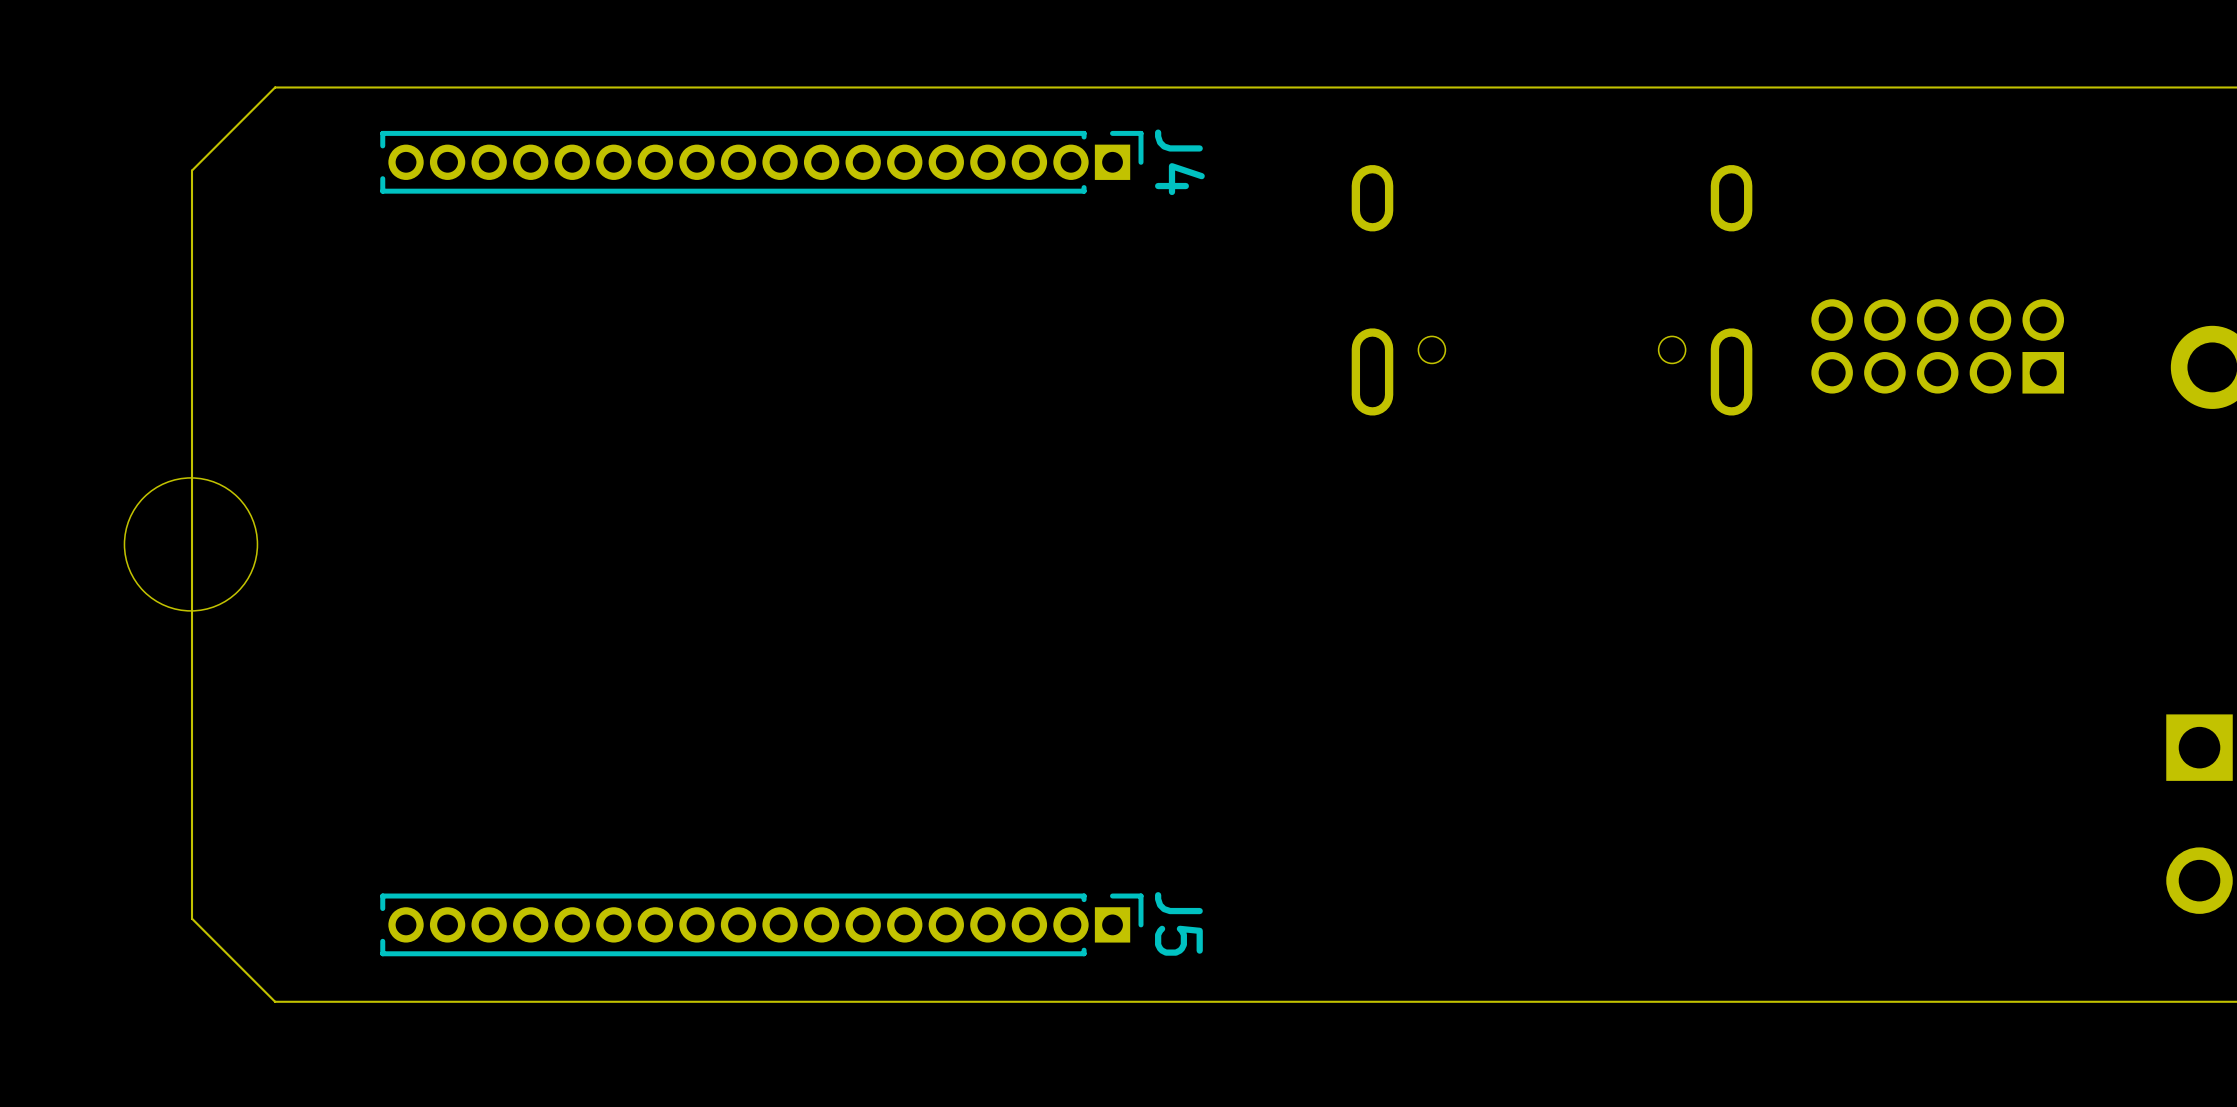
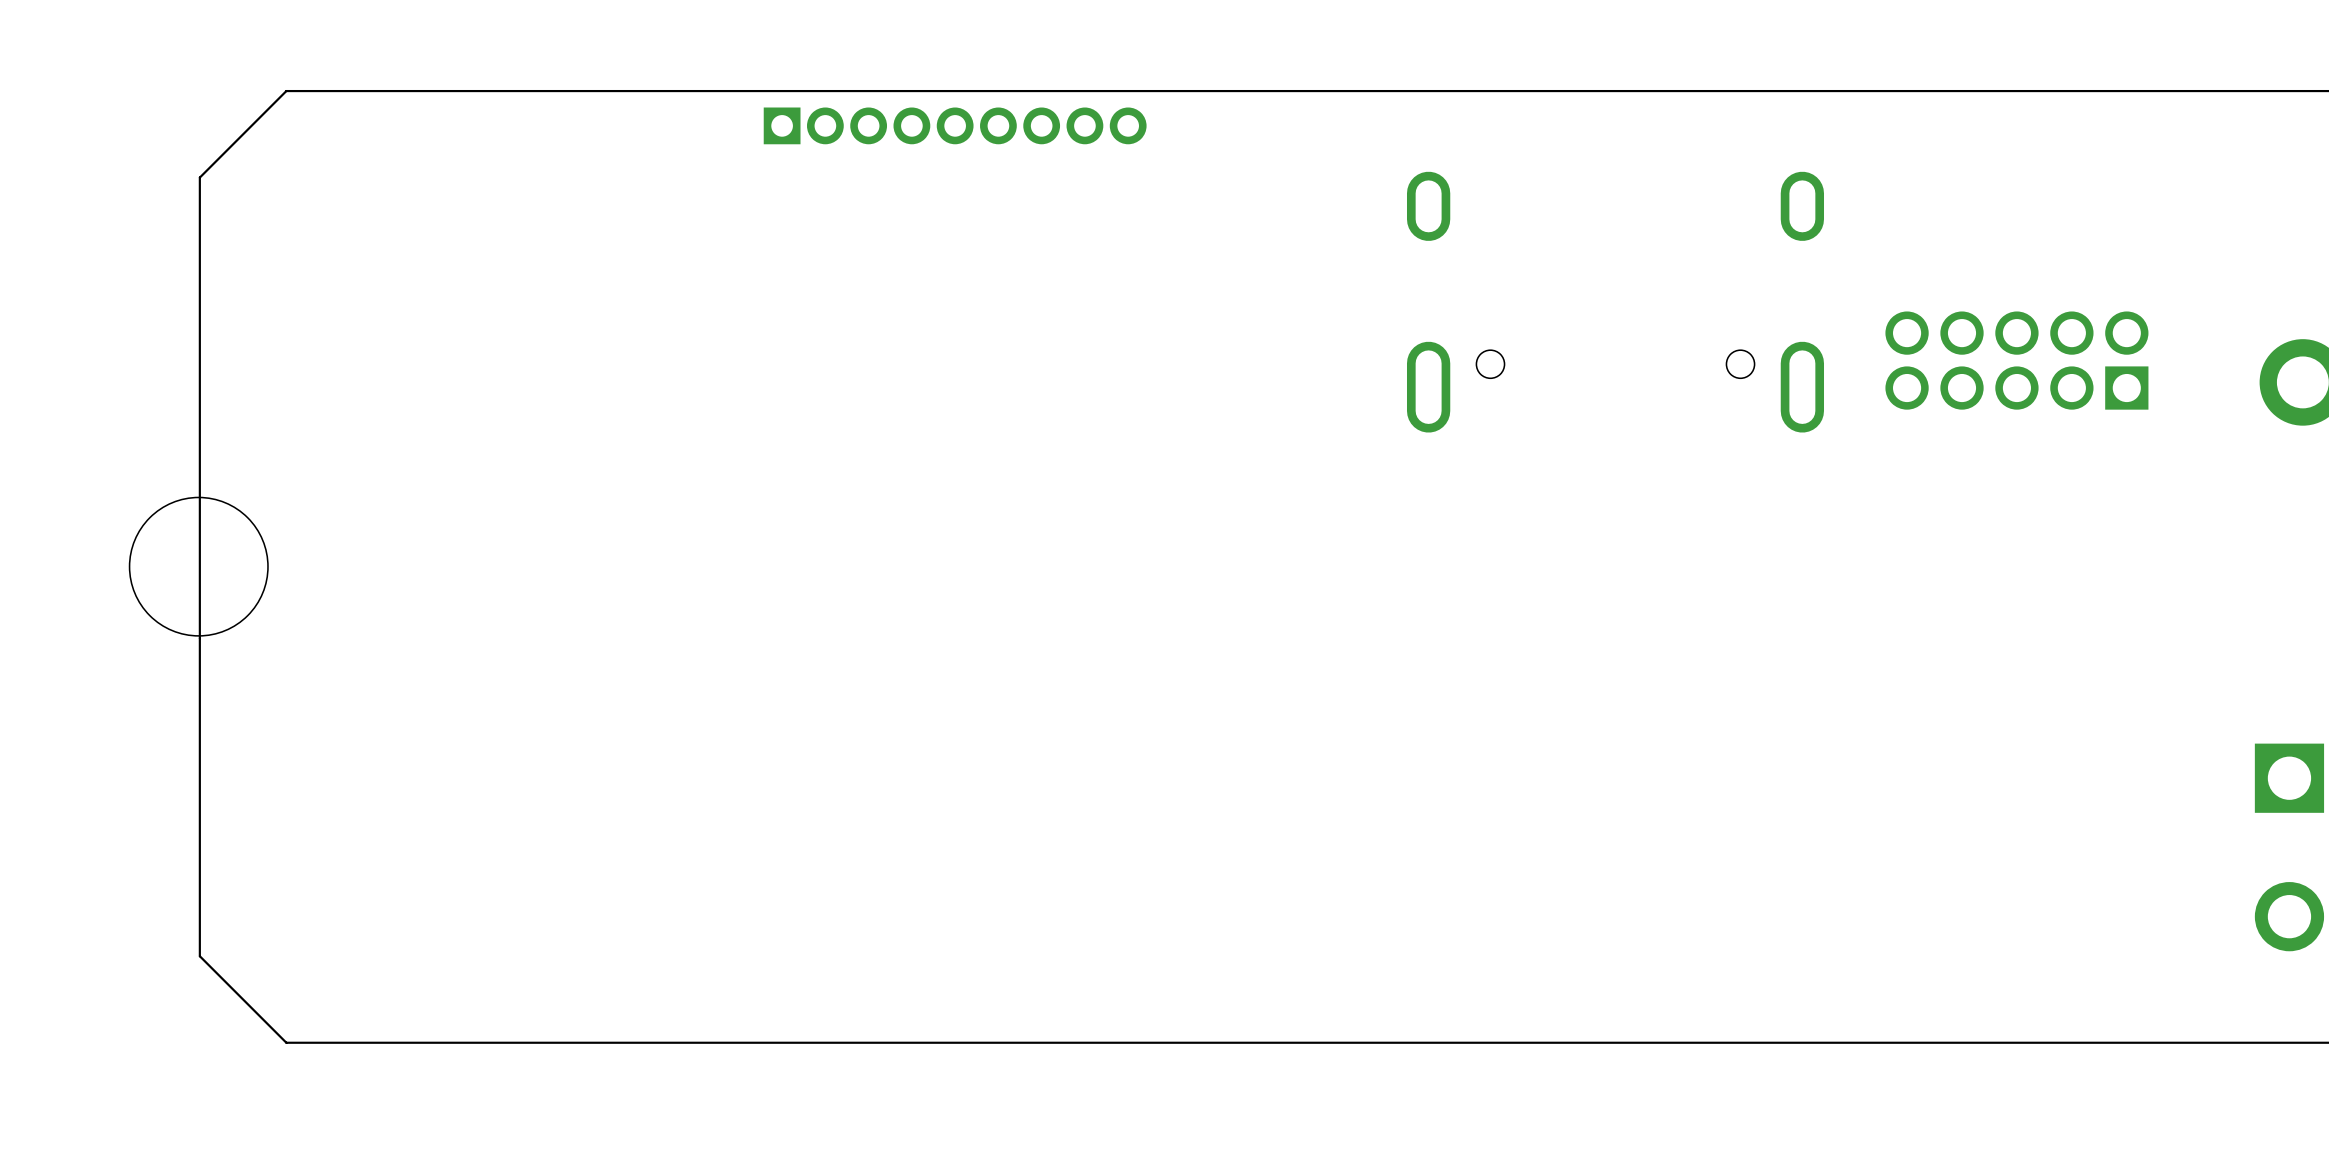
part: none -> (955, 125)
J4: (761, 162) -> none
J5: (761, 924) -> none

